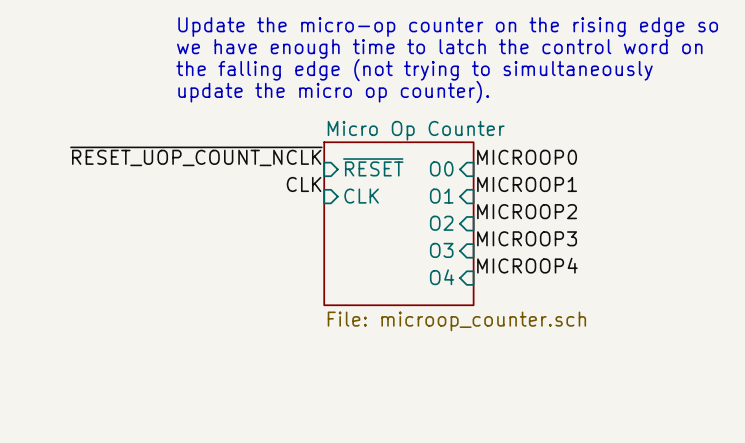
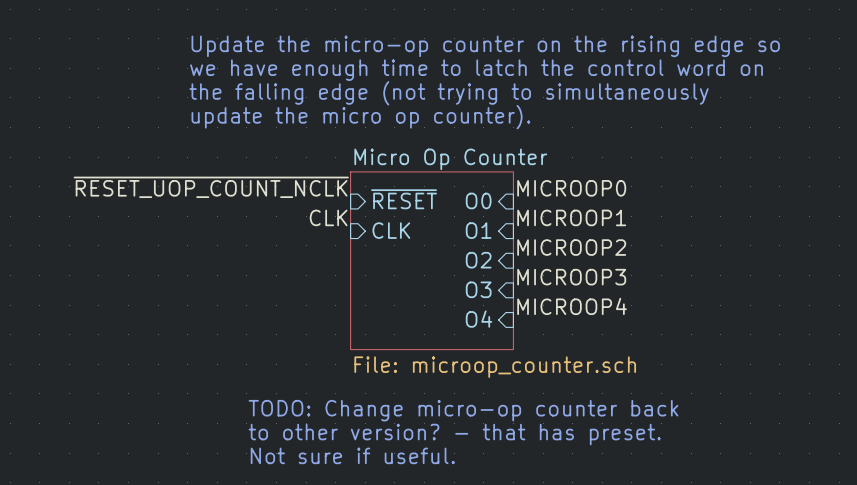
text: none -> TODO: Change micro-op counter back (463, 410)
text: none -> to other version? - that has preset. (454, 434)
text: none -> Not sure if useful. (352, 455)

